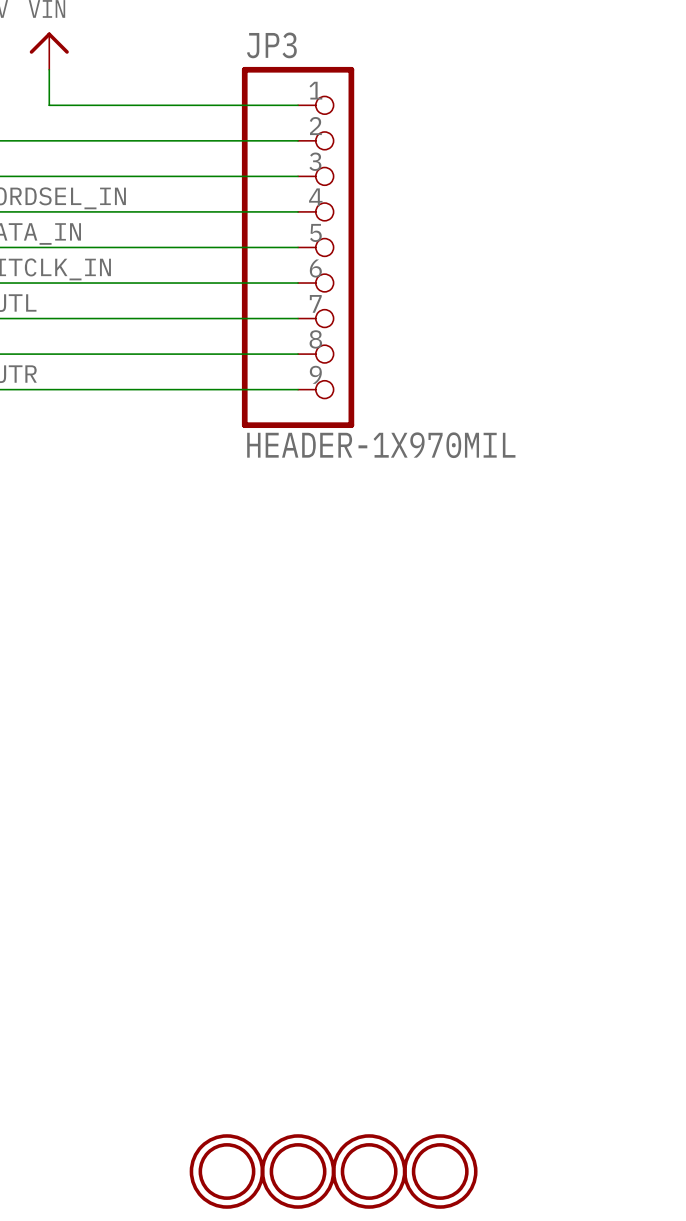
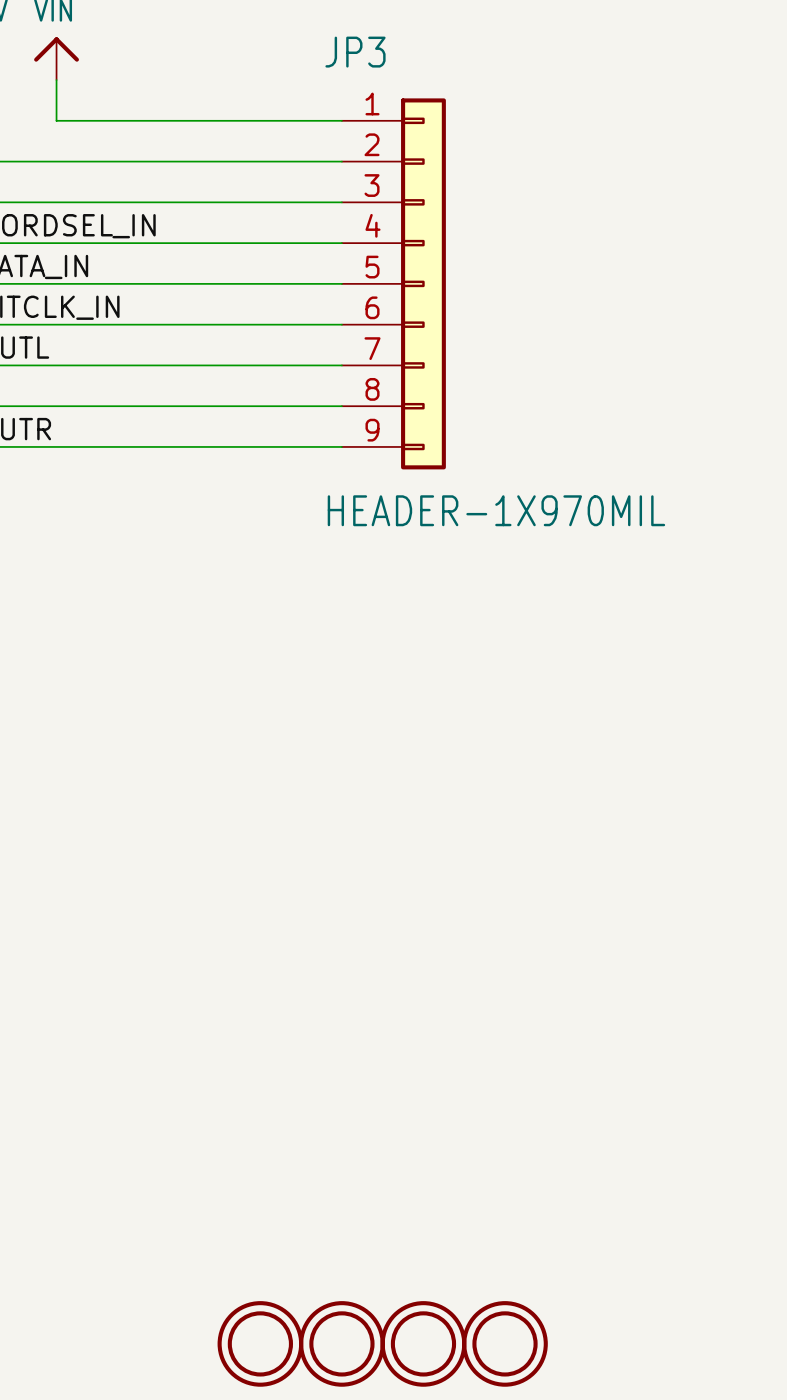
JP3 symbol: [241, 66, 355, 429] -> [341, 98, 446, 470]

